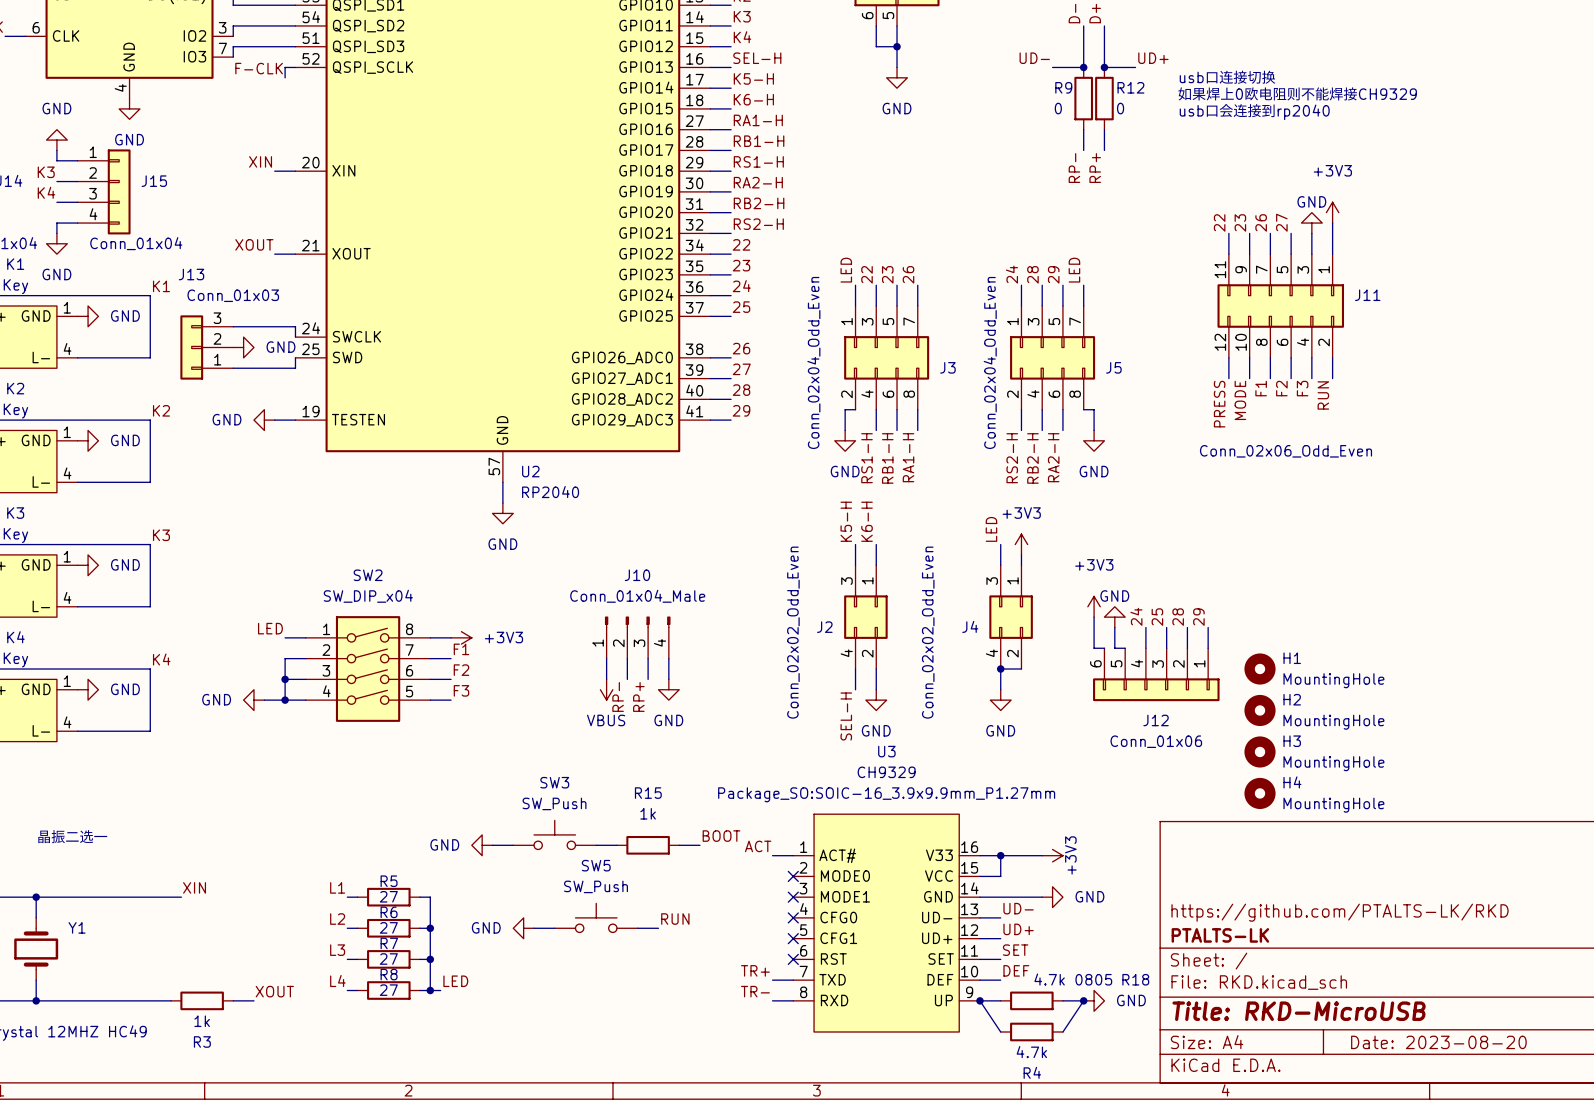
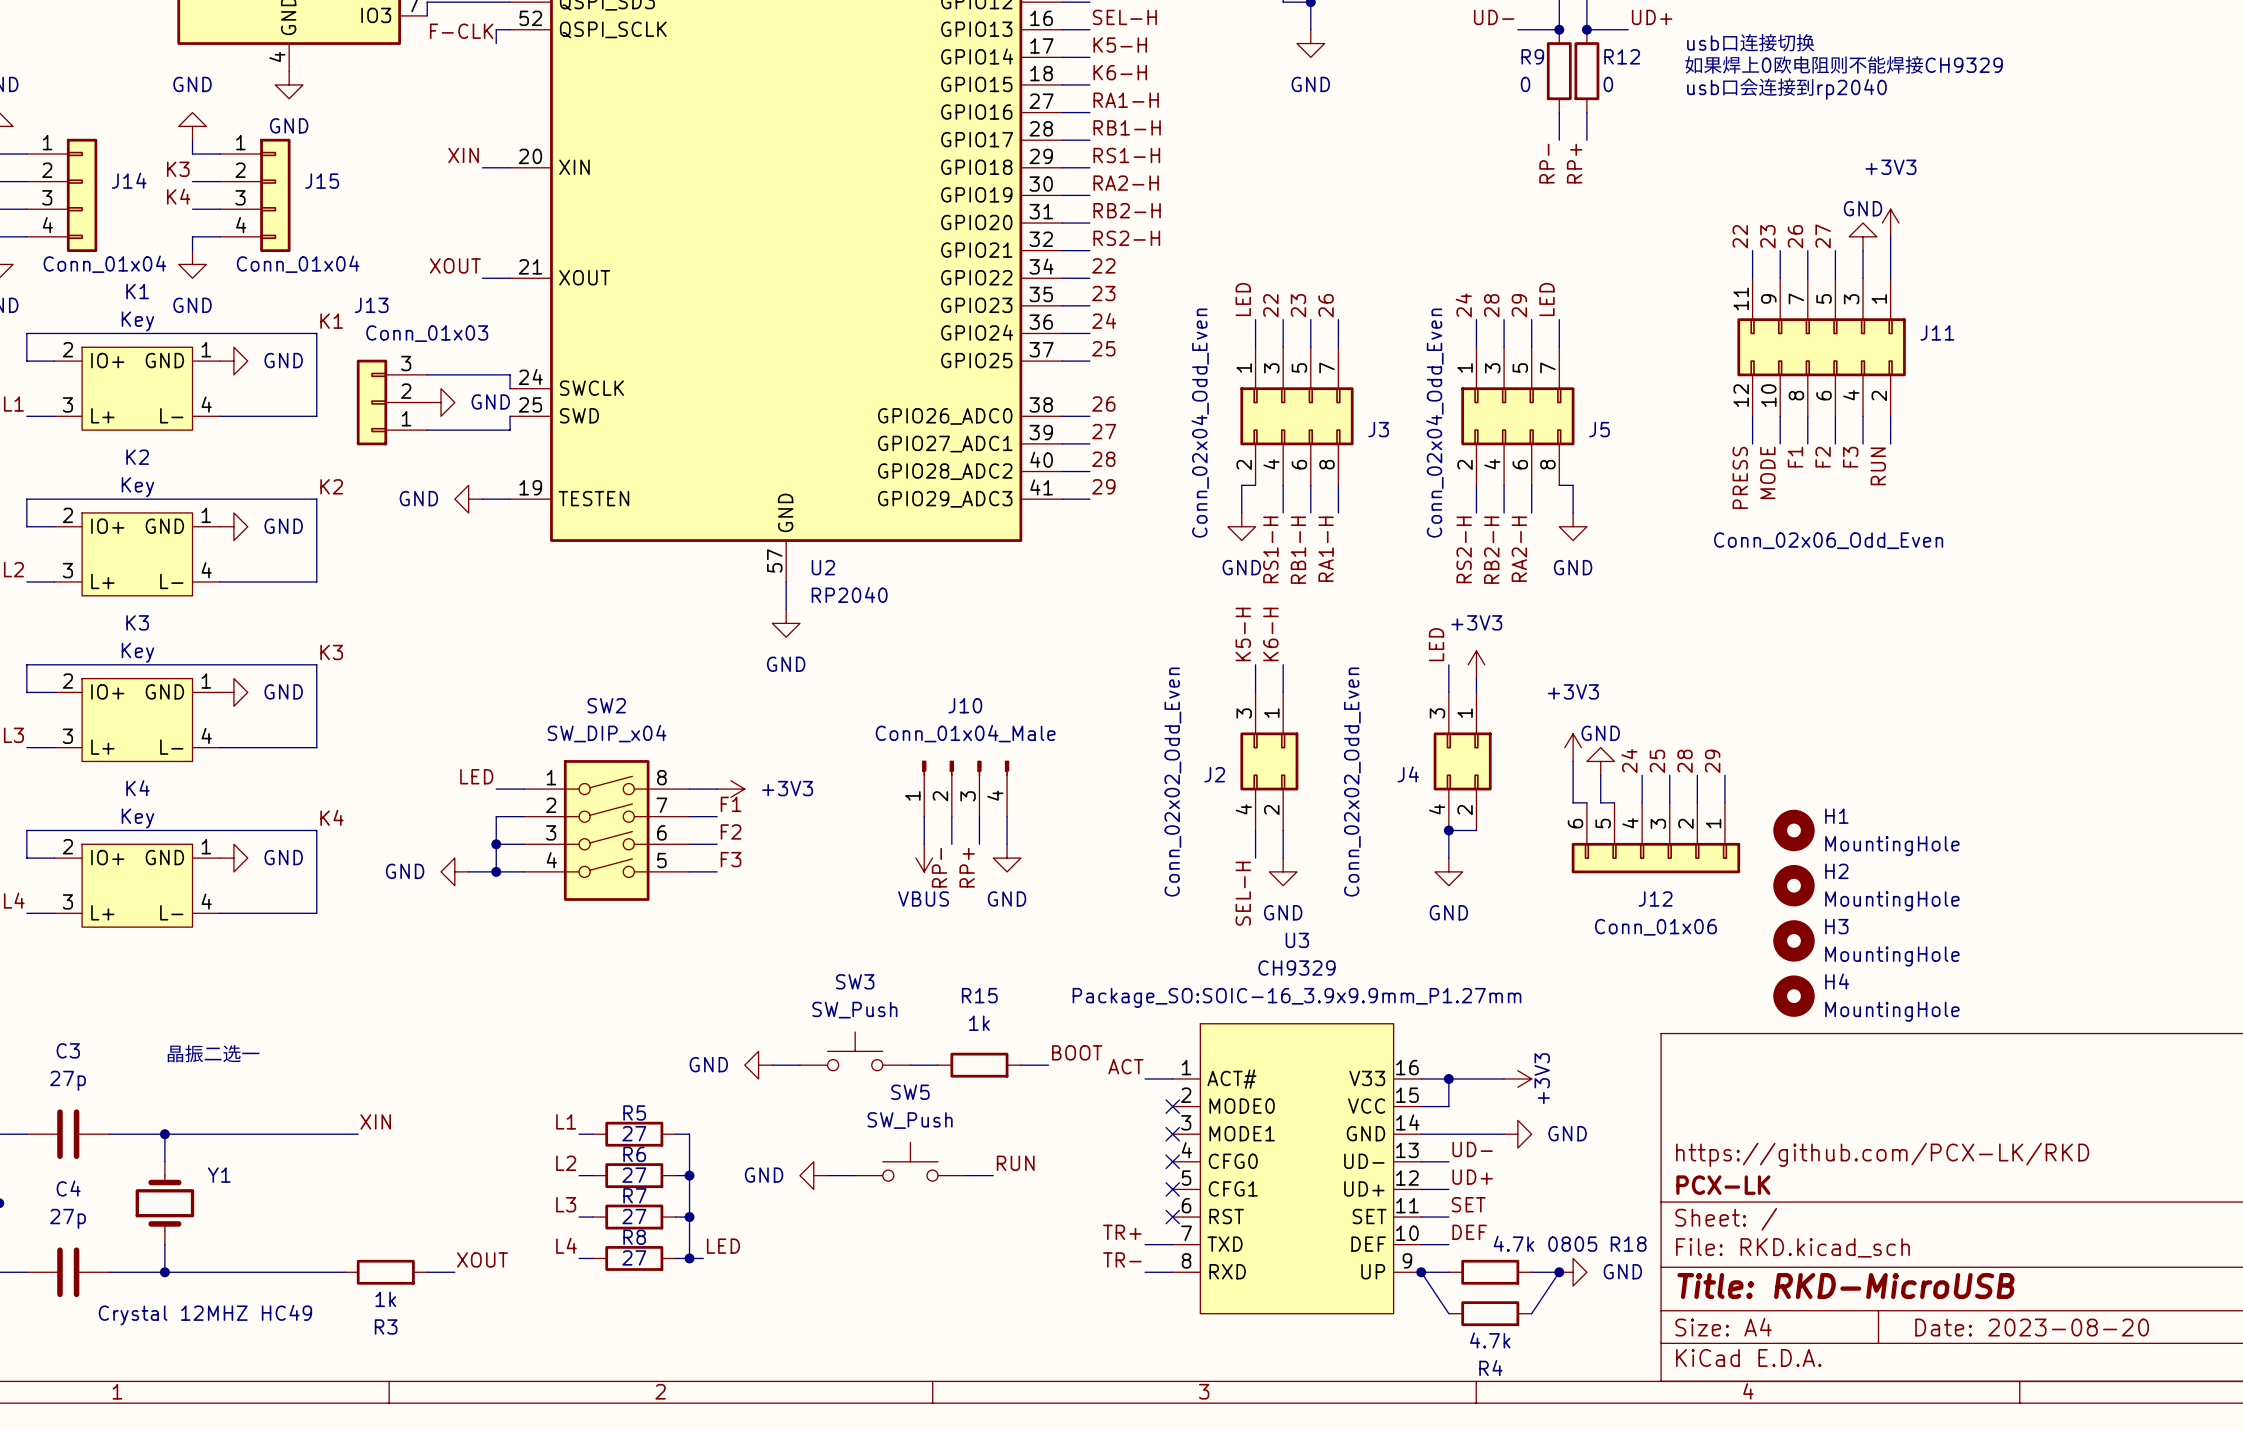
title block: https://github.com/PTALTS-LK/RKD (1340, 912) -> https://github.com/PCX-LK/RKD (1882, 1154)
title block: PTALTS-LK (1220, 935) -> PCX-LK (1723, 1185)

